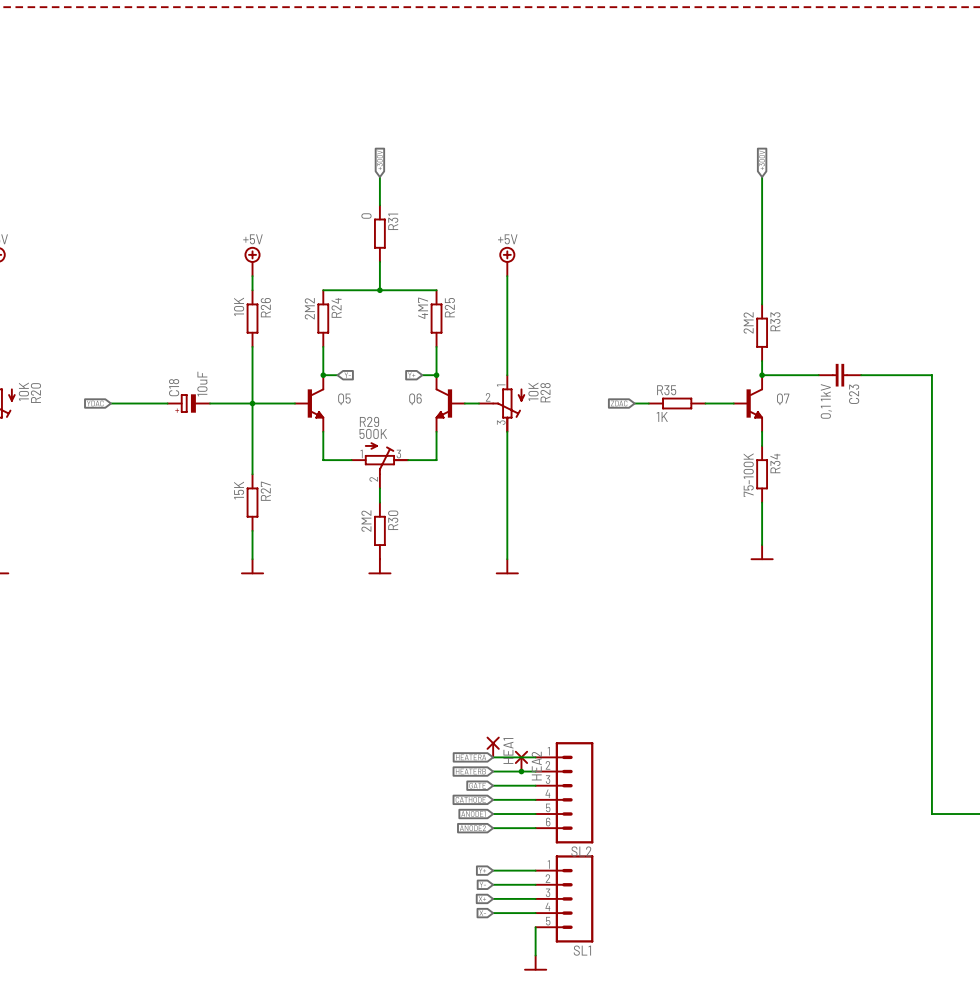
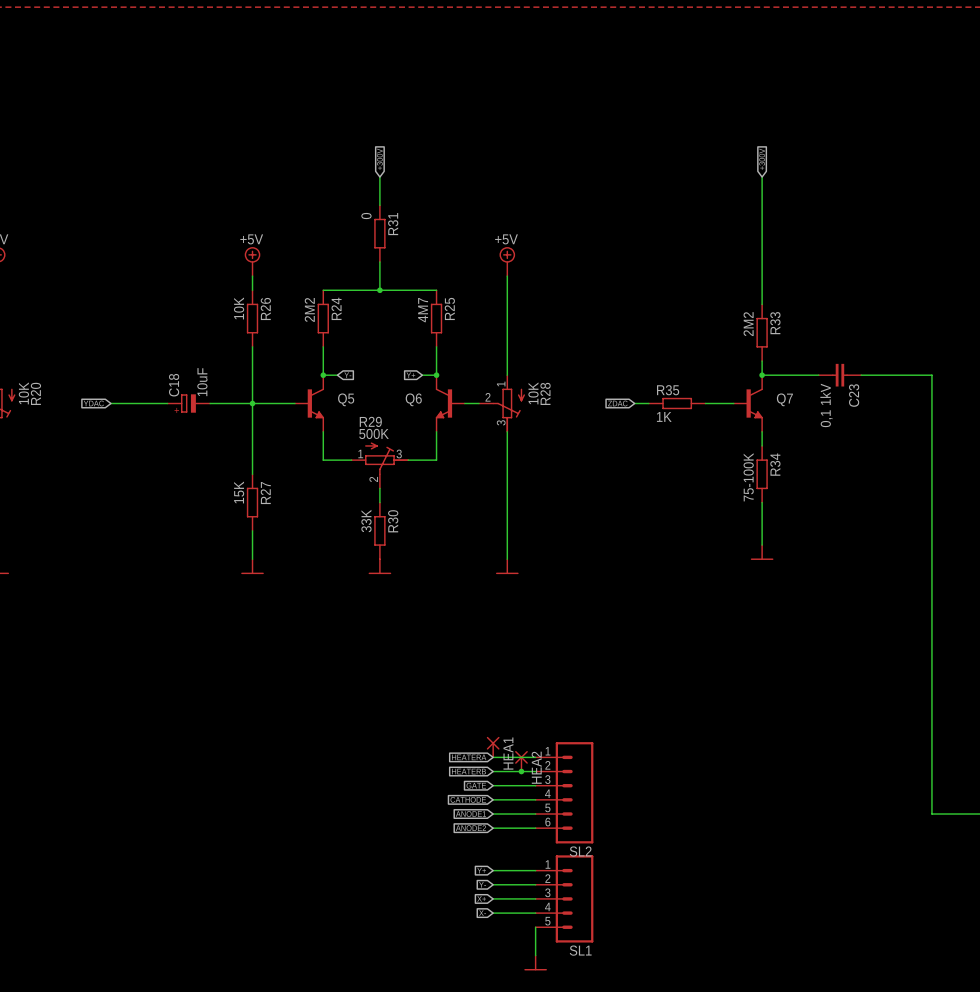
R30 value: 2M2 (366, 521) -> 33K (366, 521)

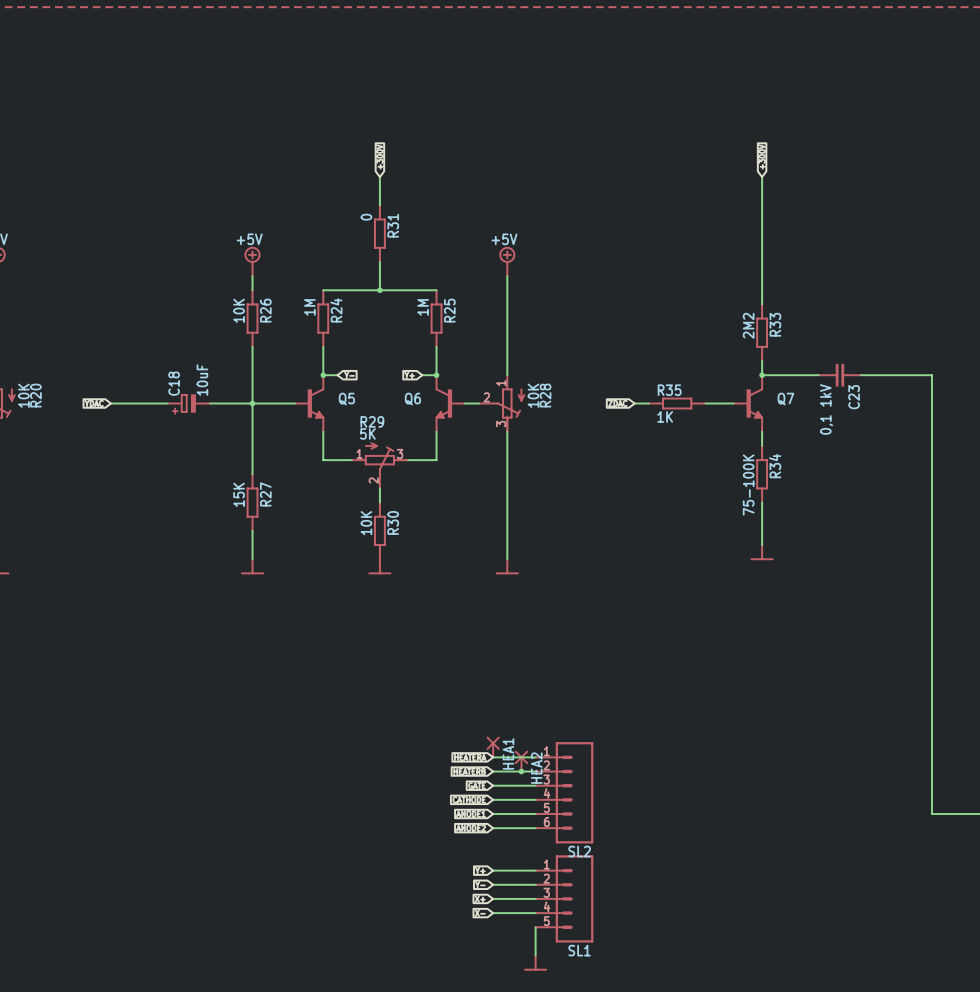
R24 value: 2M2 (309, 309) -> 1M (309, 307)
R25 value: 4M7 (423, 310) -> 1M (423, 307)
R29 value: 500K (374, 433) -> 5K (367, 433)
R30 value: 33K (366, 521) -> 10K (366, 523)

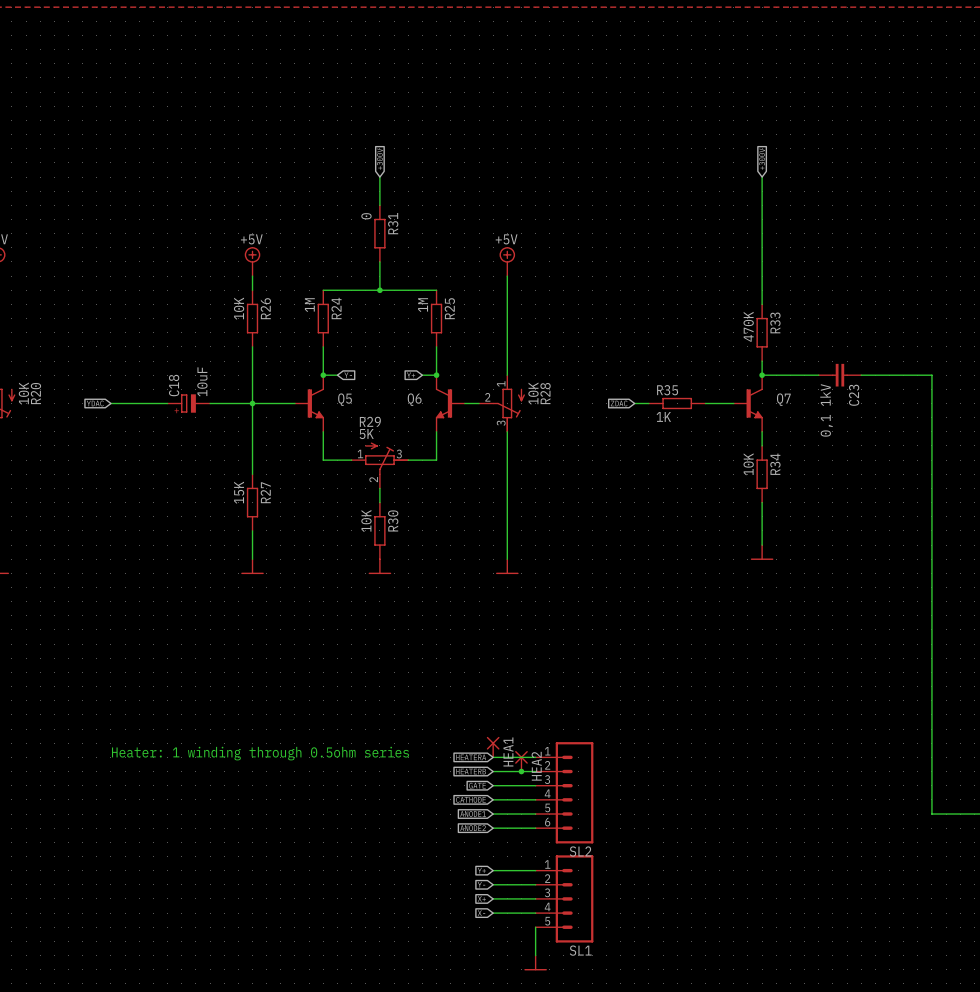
R33 value: 2M2 (748, 325) -> 470K (748, 326)
R34 value: 75-100K (748, 484) -> 10K (748, 464)
text: none -> Heater: 1 winding through 0.5ohm series (260, 753)

